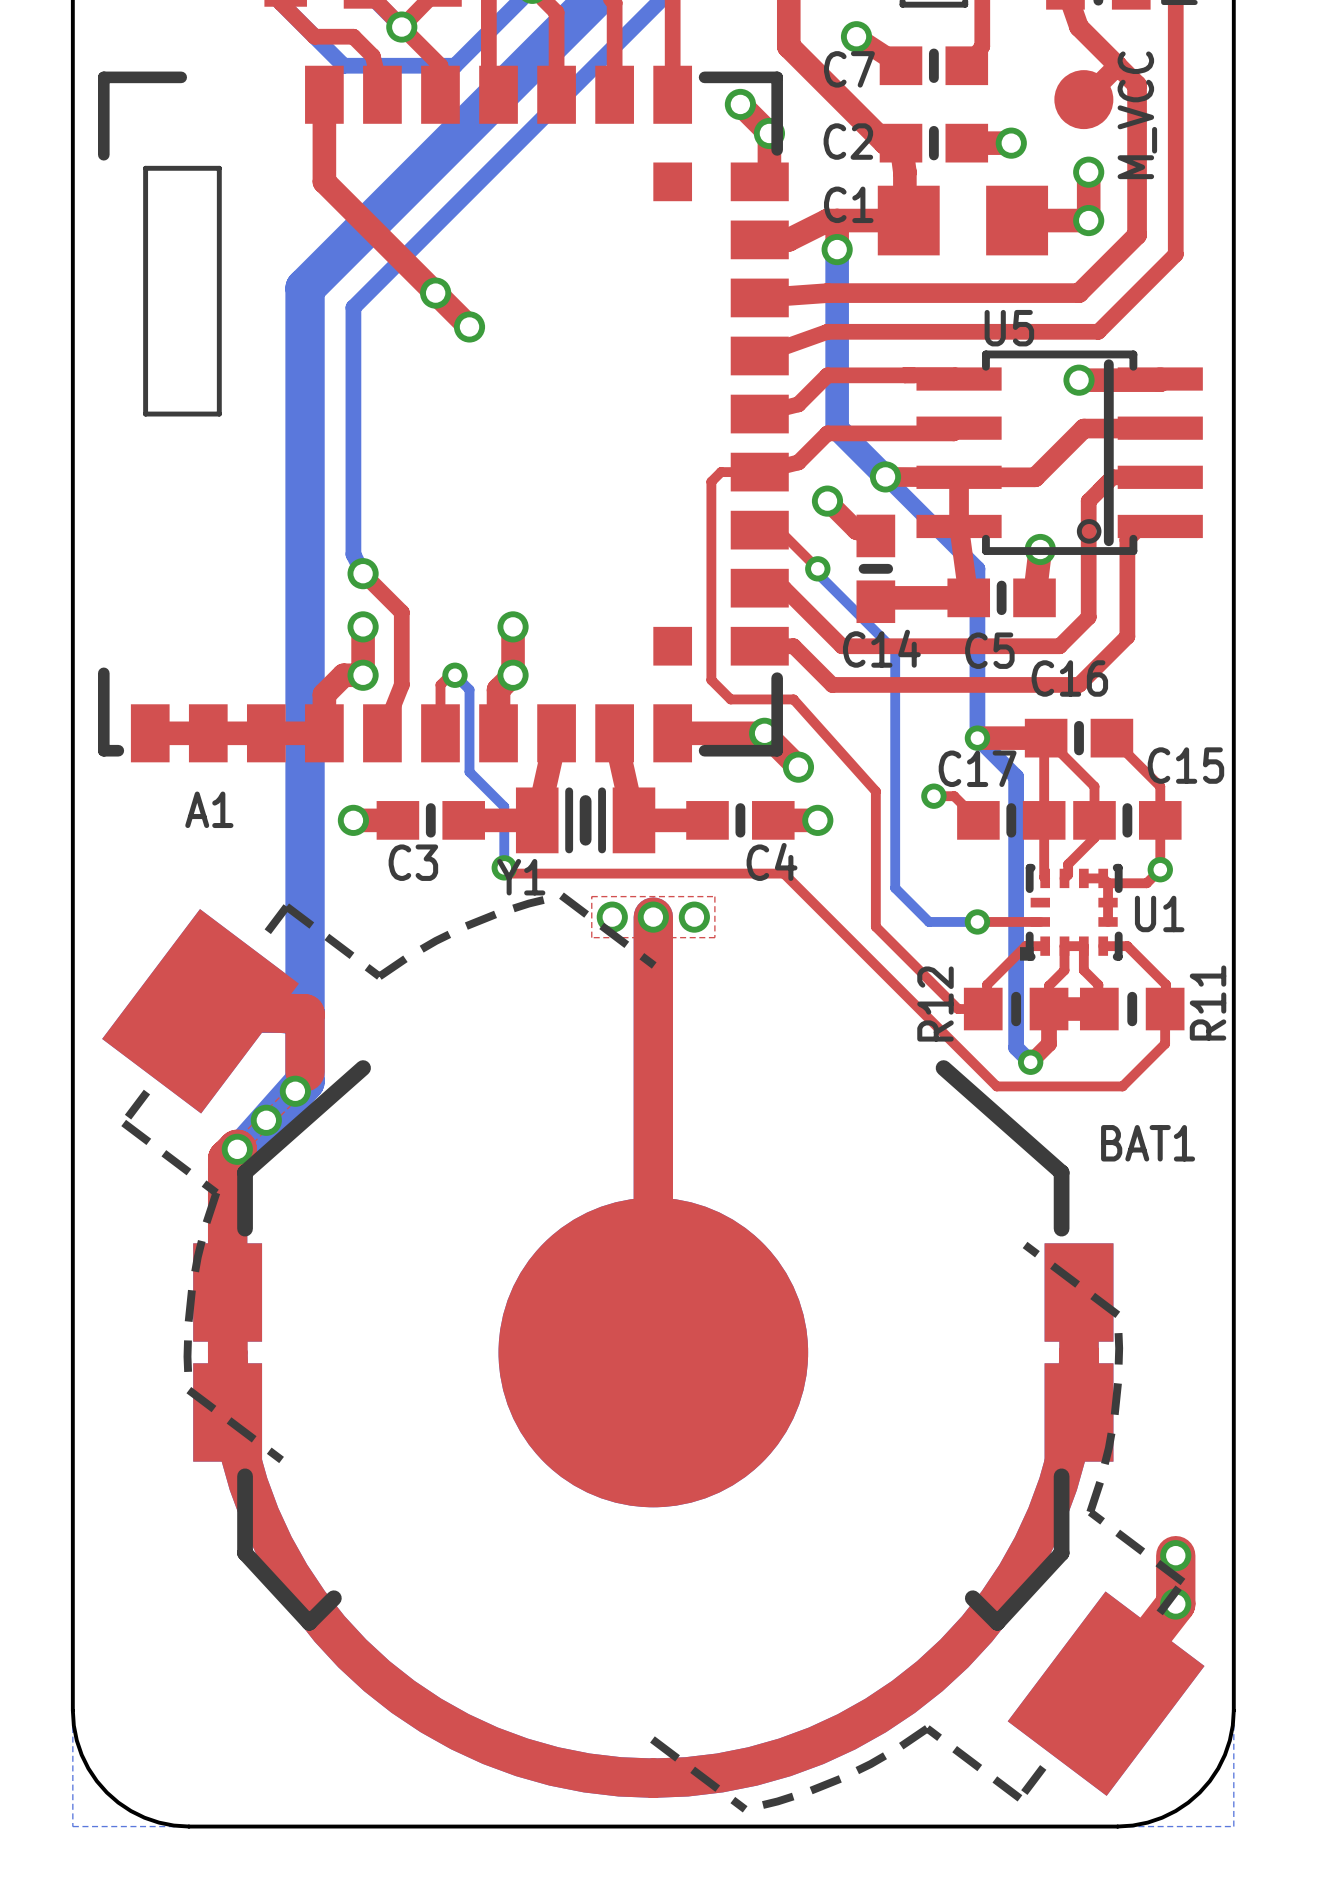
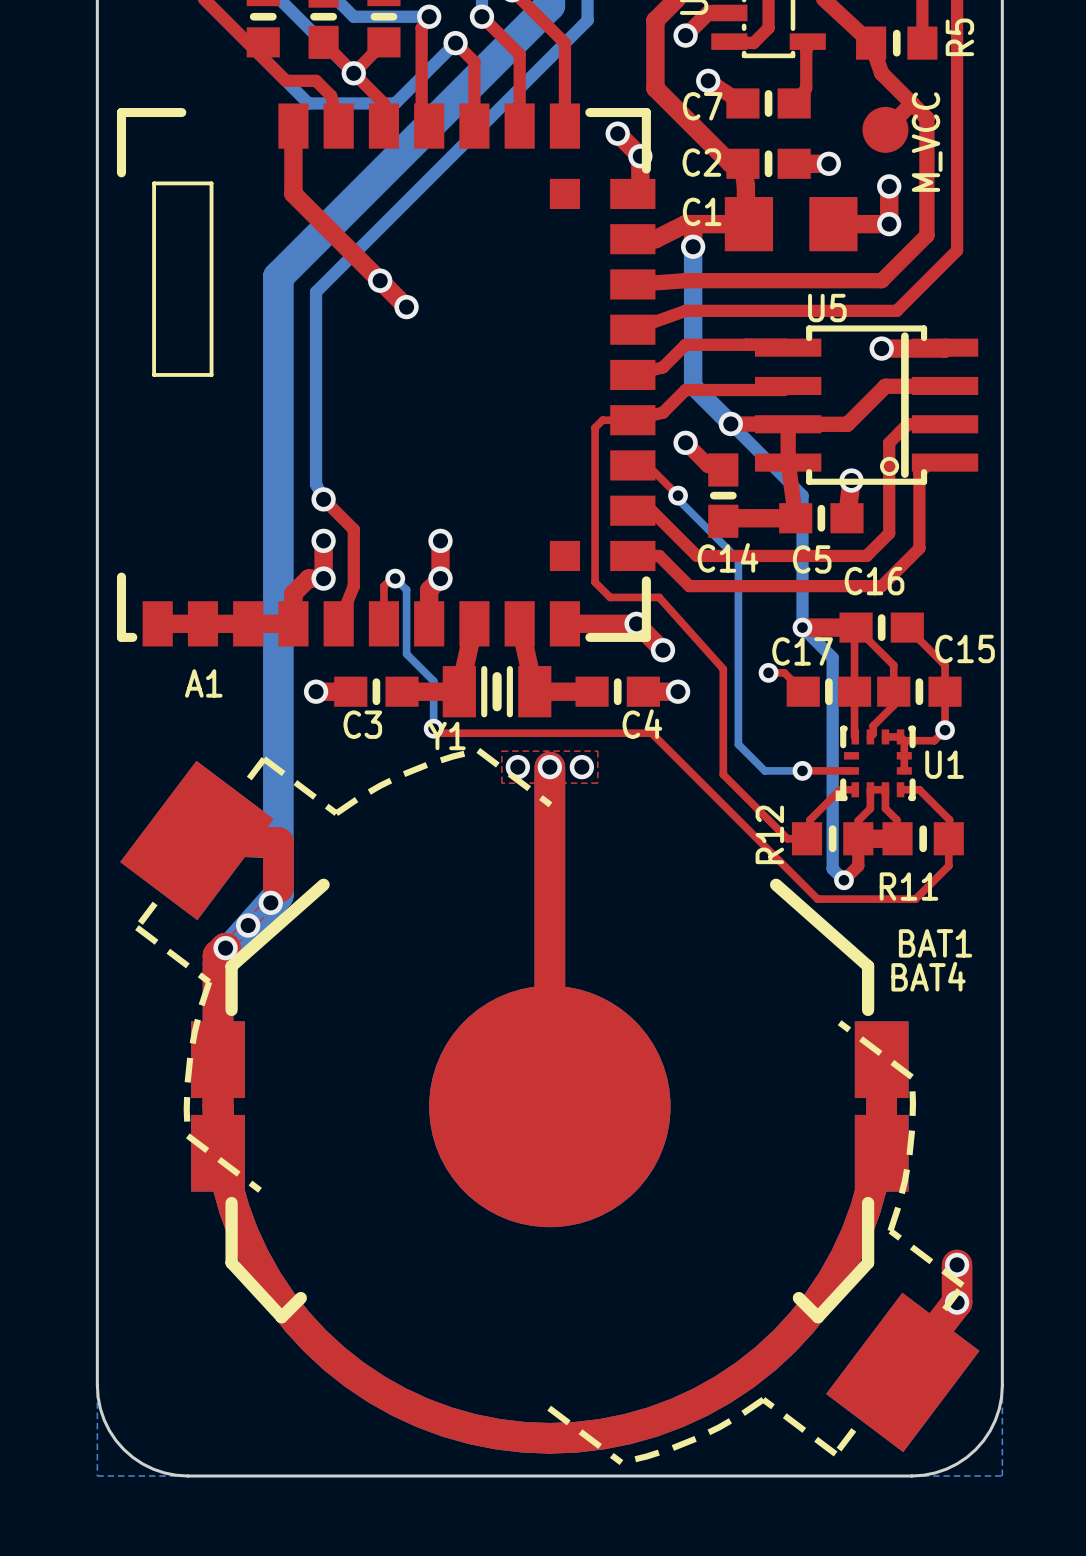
R11 name rotation: 0° (1208, 1003) -> 90° clockwise (908, 886)
R11 name position: R11 (1208, 1003) -> R11 (908, 886)
text: none -> BAT4 (928, 976)

